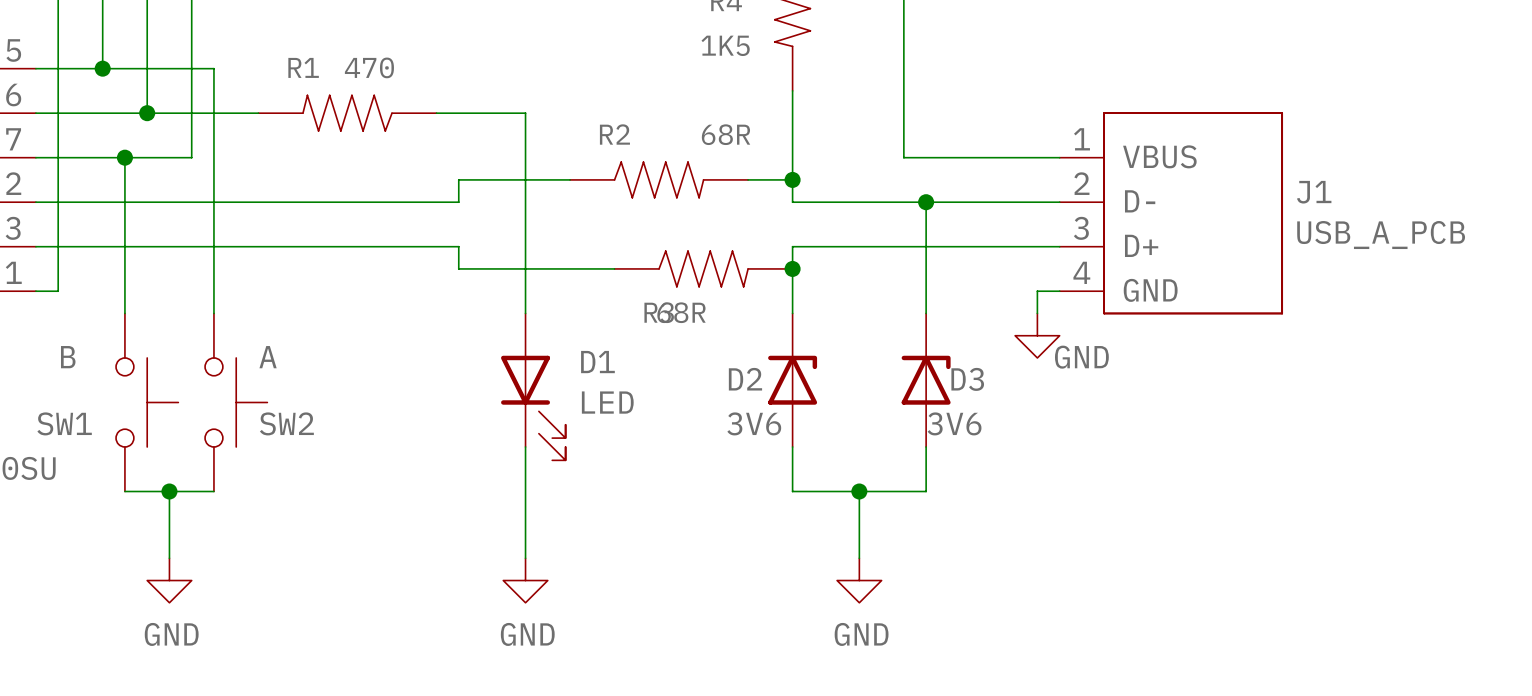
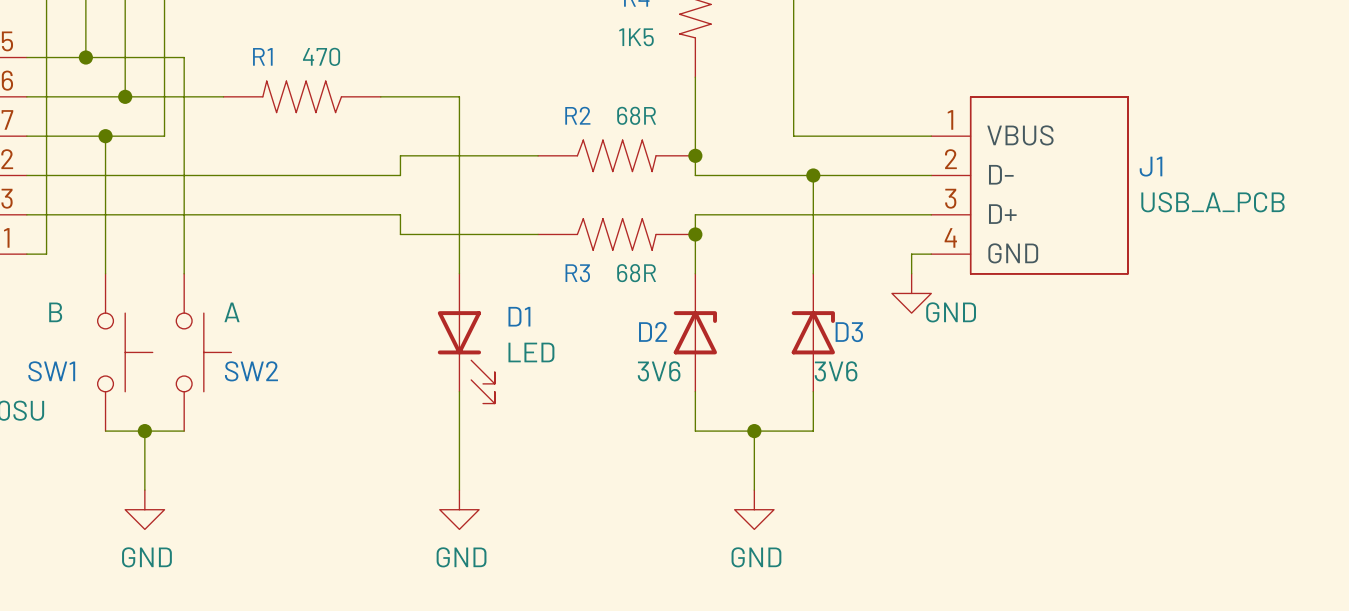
R2 position: (659, 179) -> (616, 155)

